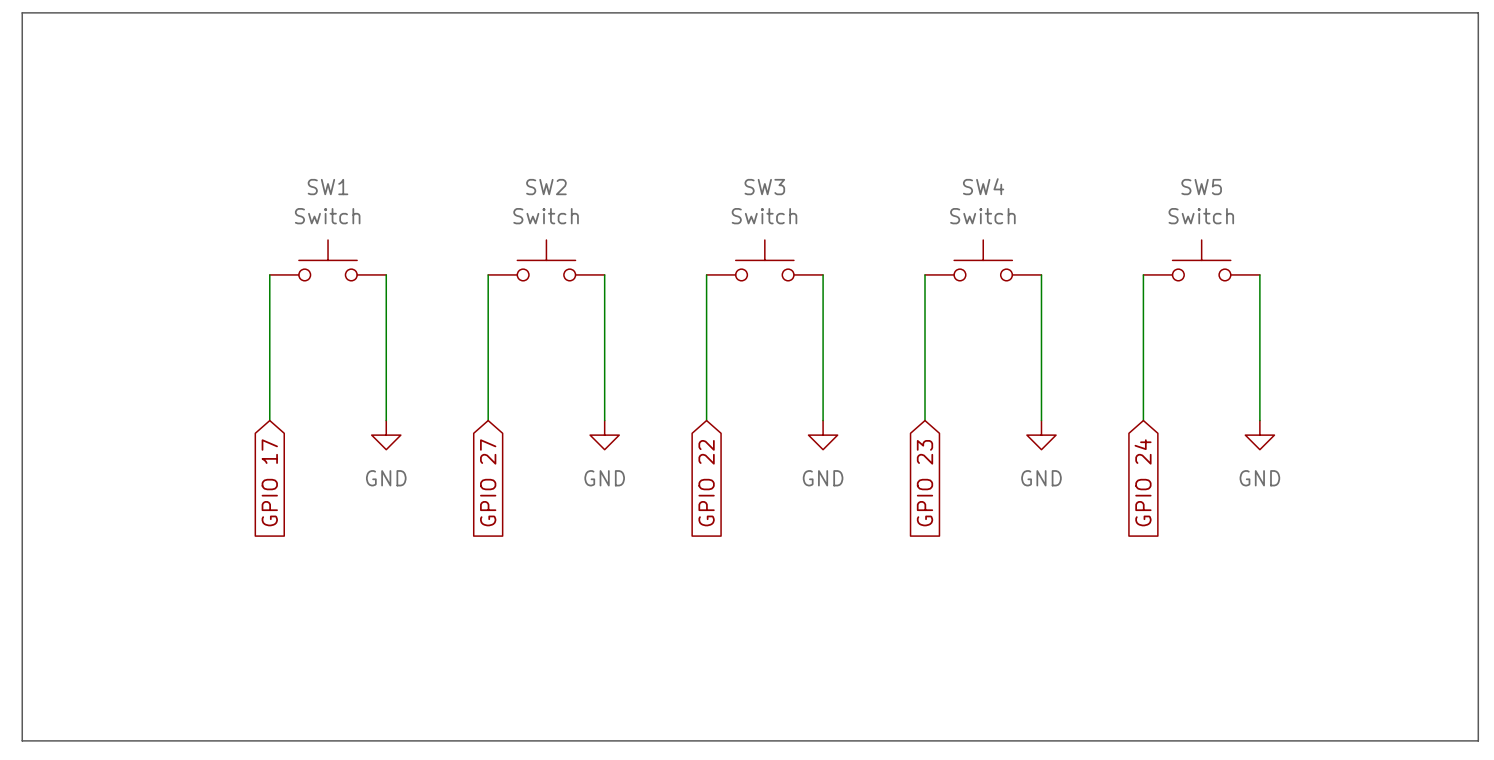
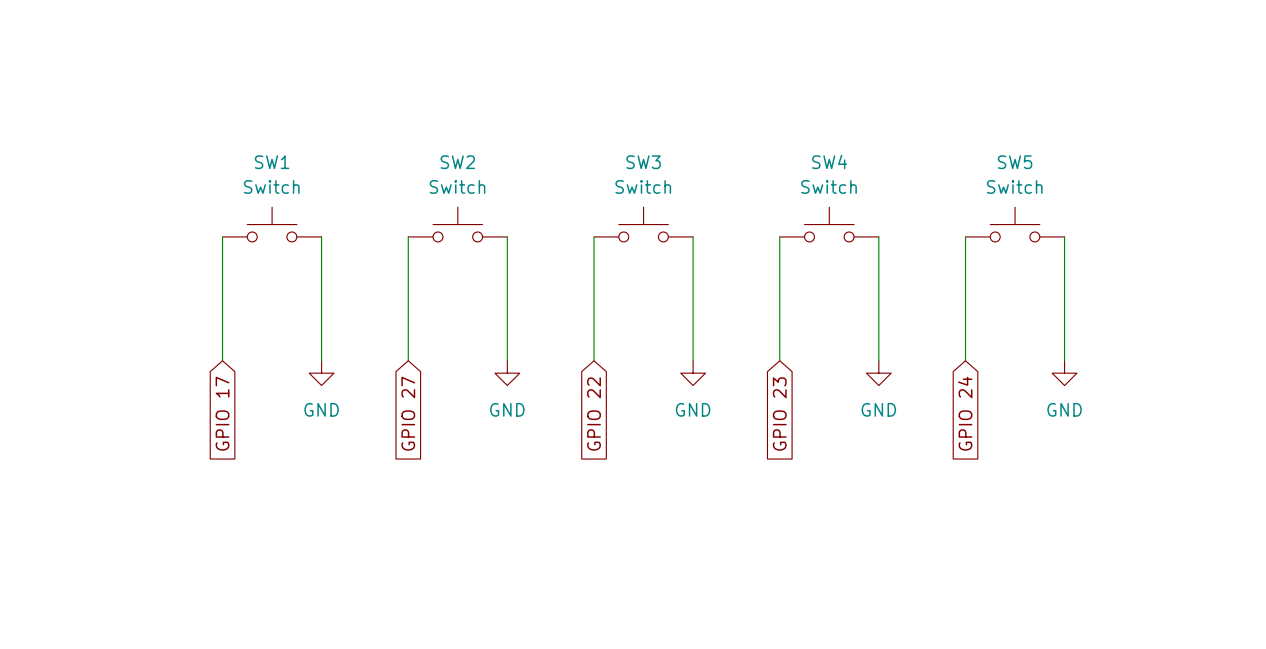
line: (22, 12) (1478, 12) (1478, 740) (22, 740) (22, 12) -> none

